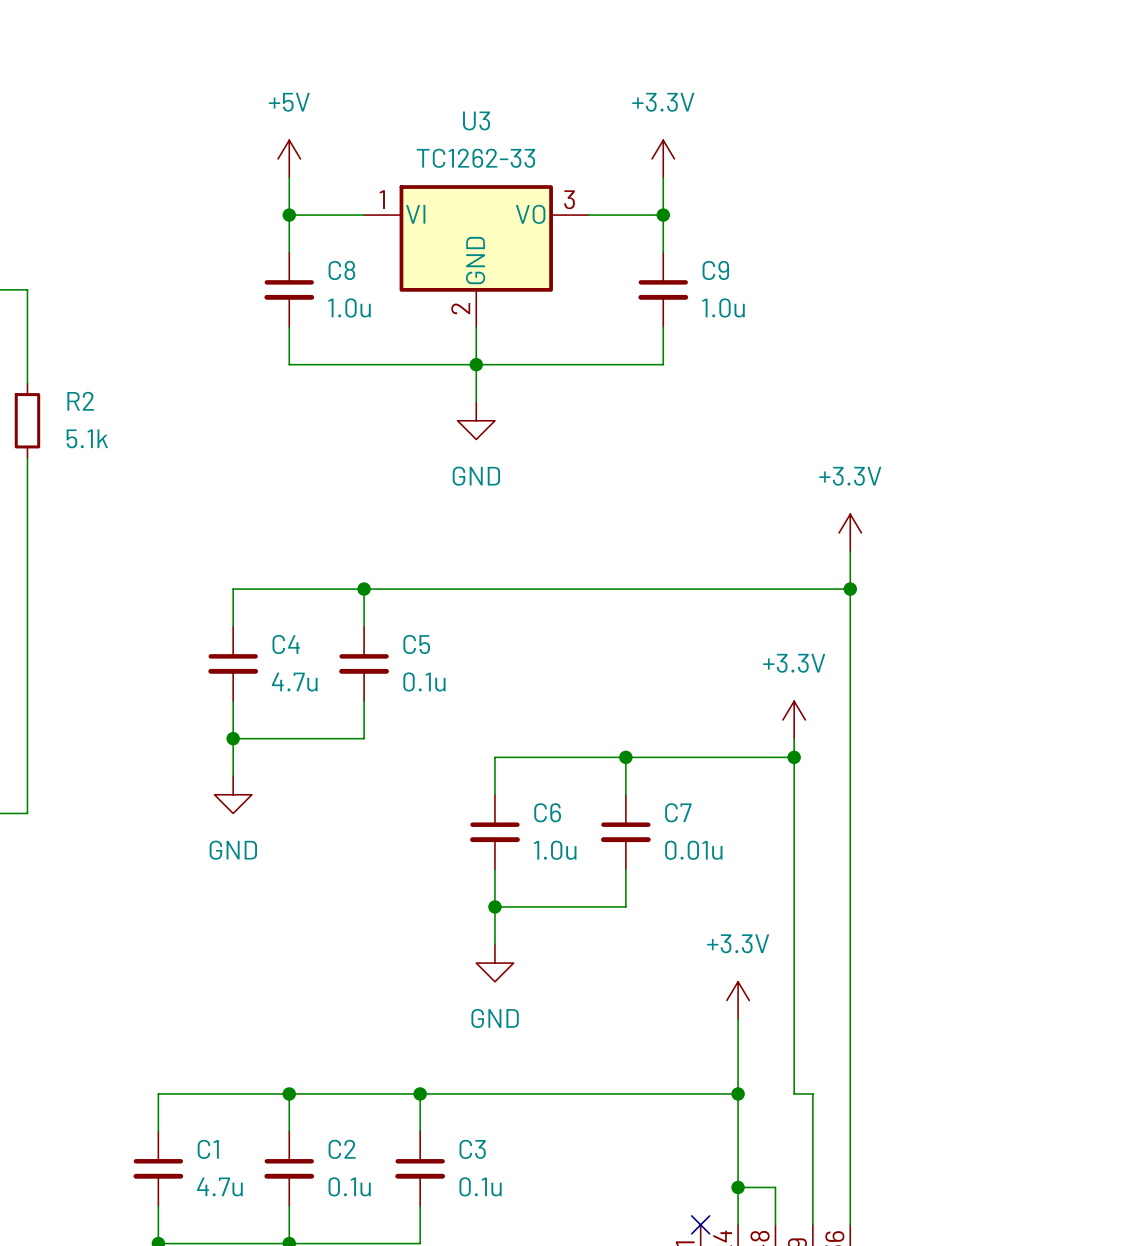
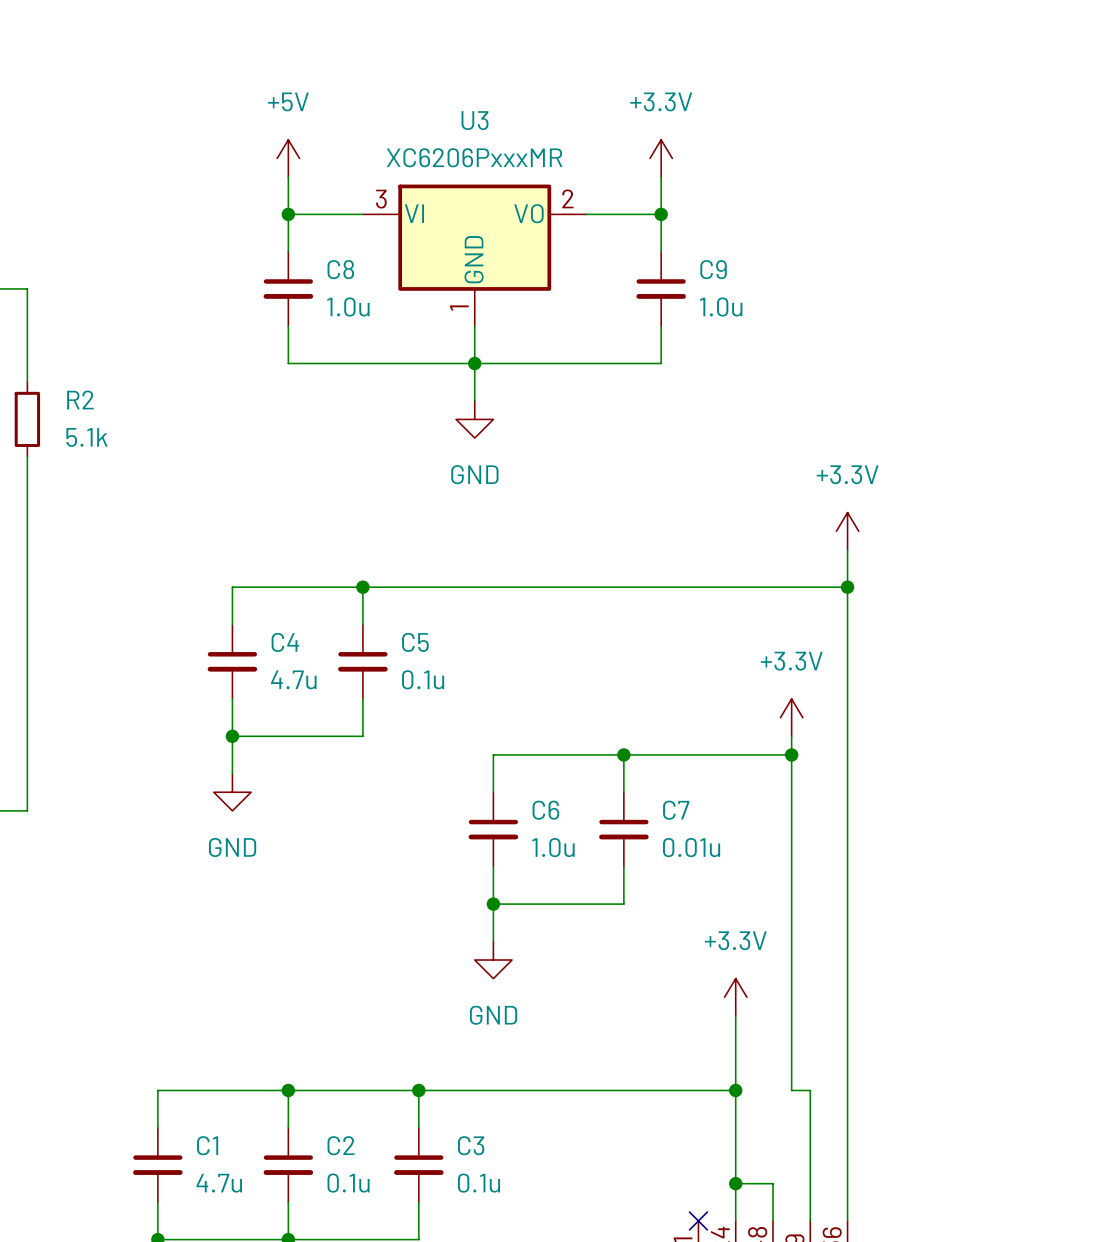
U3 value: TC1262-33 (475, 158) -> XC6206PxxxMR (474, 157)
U3 pin number: 1 (382, 199) -> 3 (381, 199)
U3 pin number: 3 (569, 199) -> 2 (567, 198)
U3 pin number: 2 (460, 308) -> 1 (459, 308)

